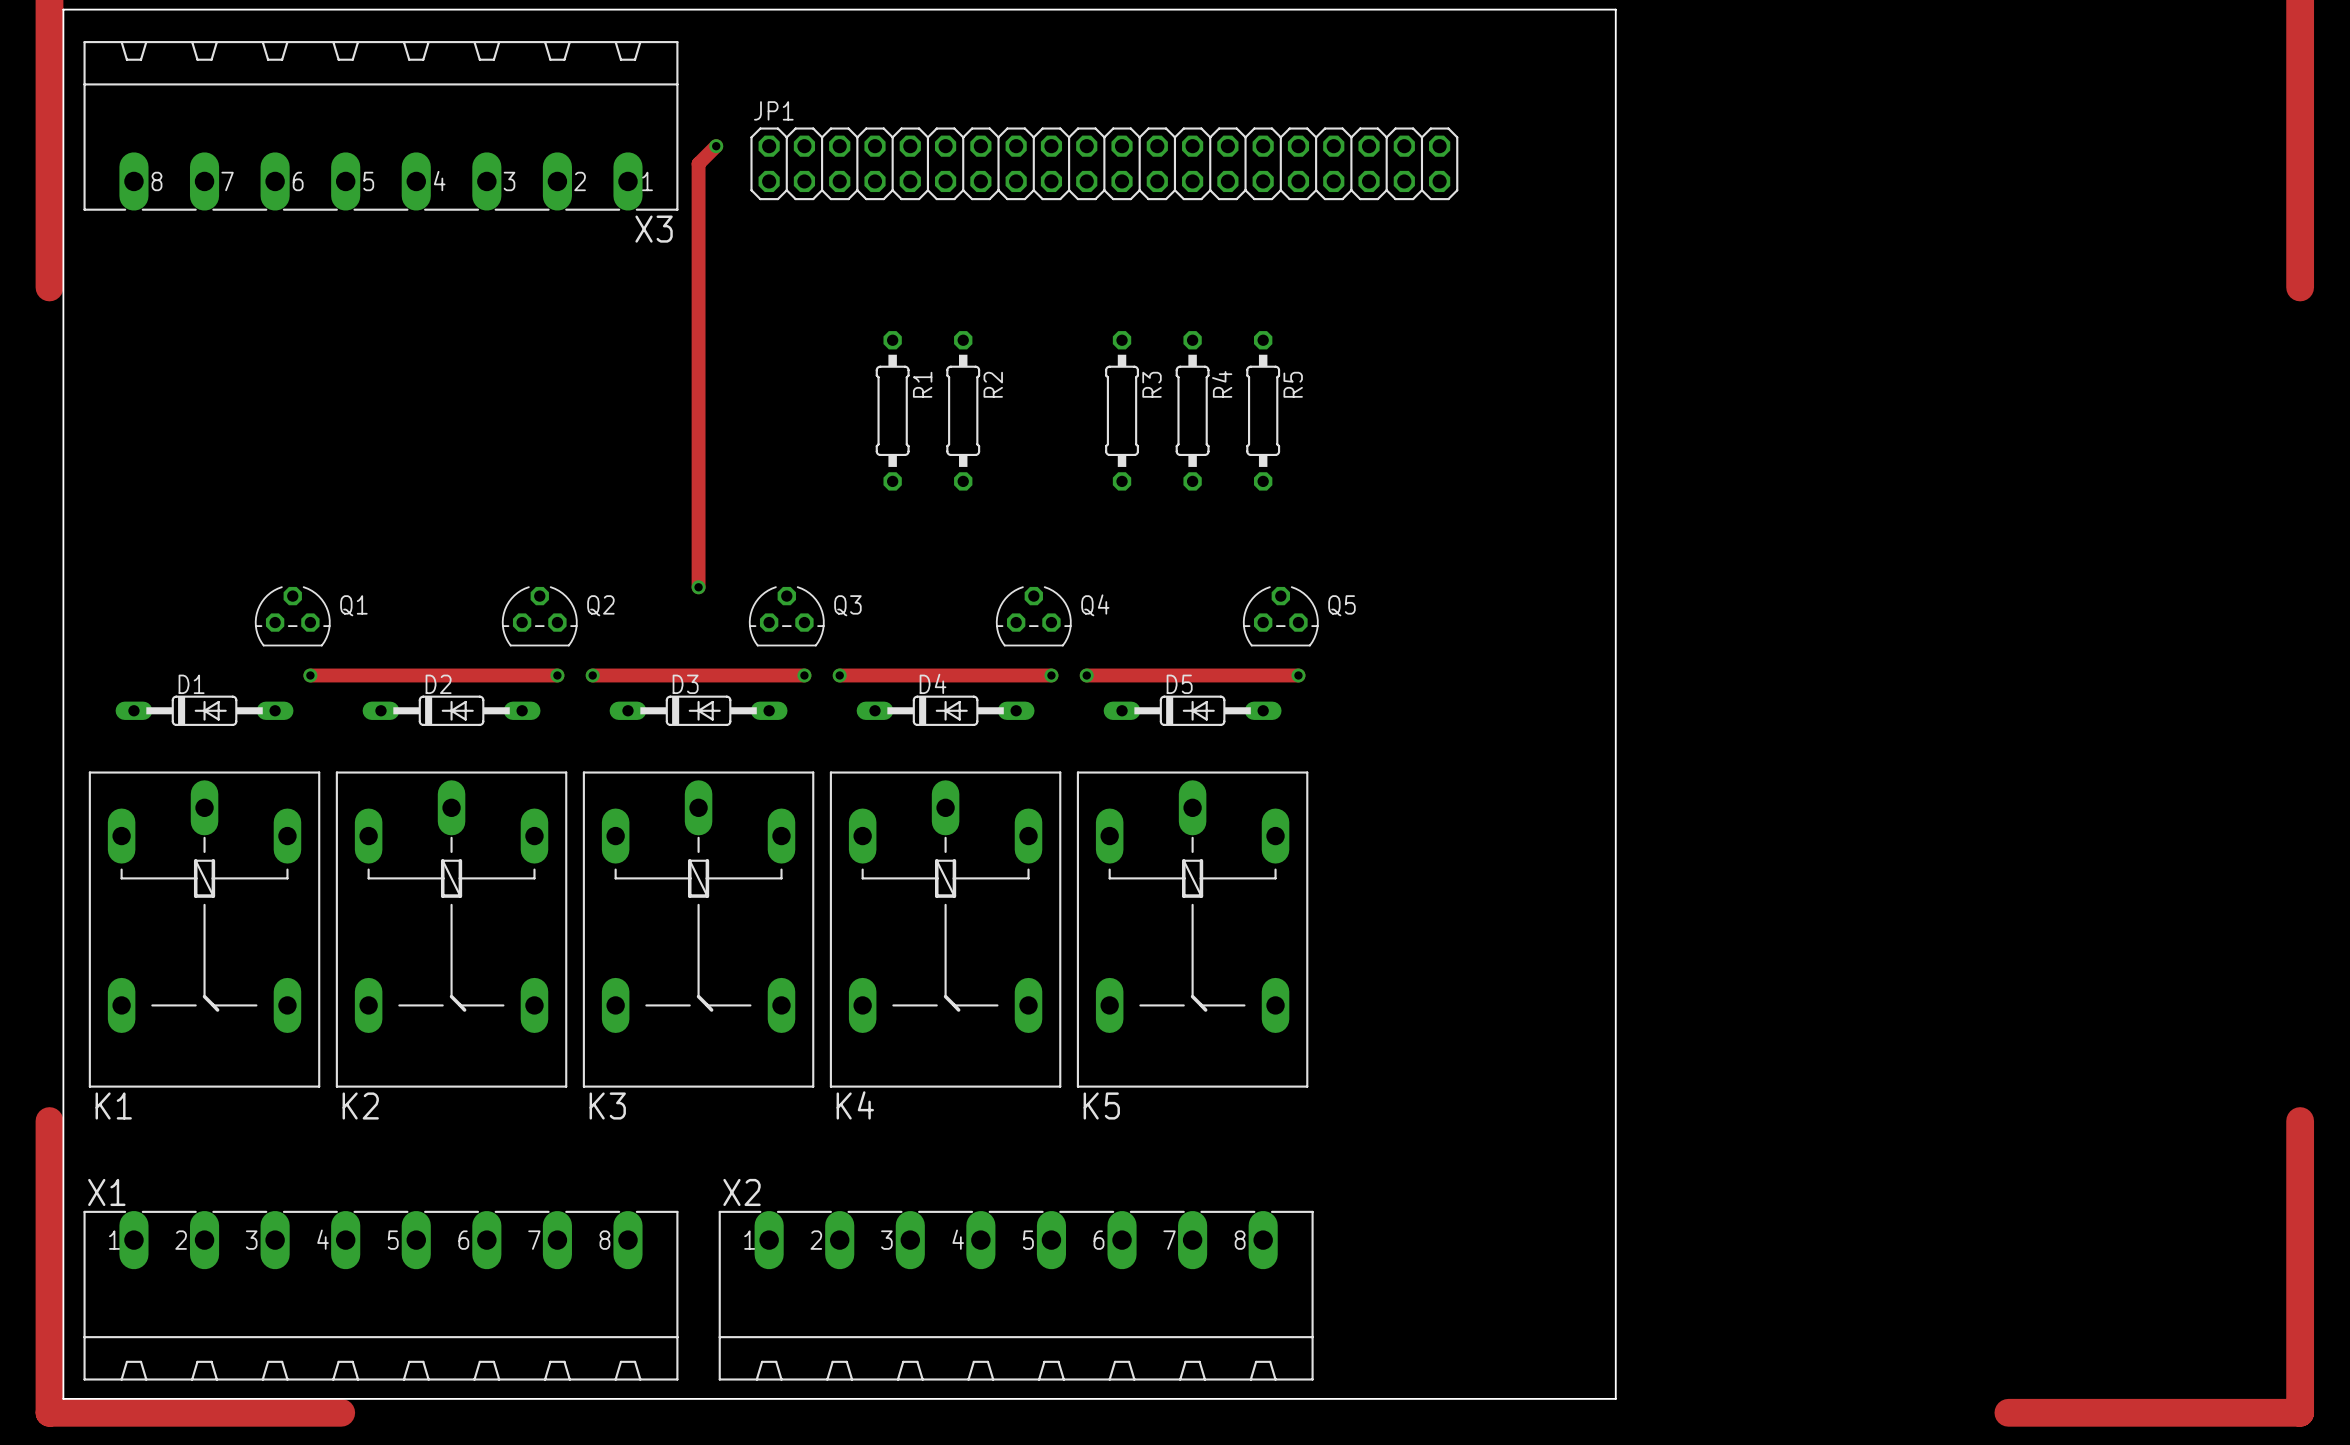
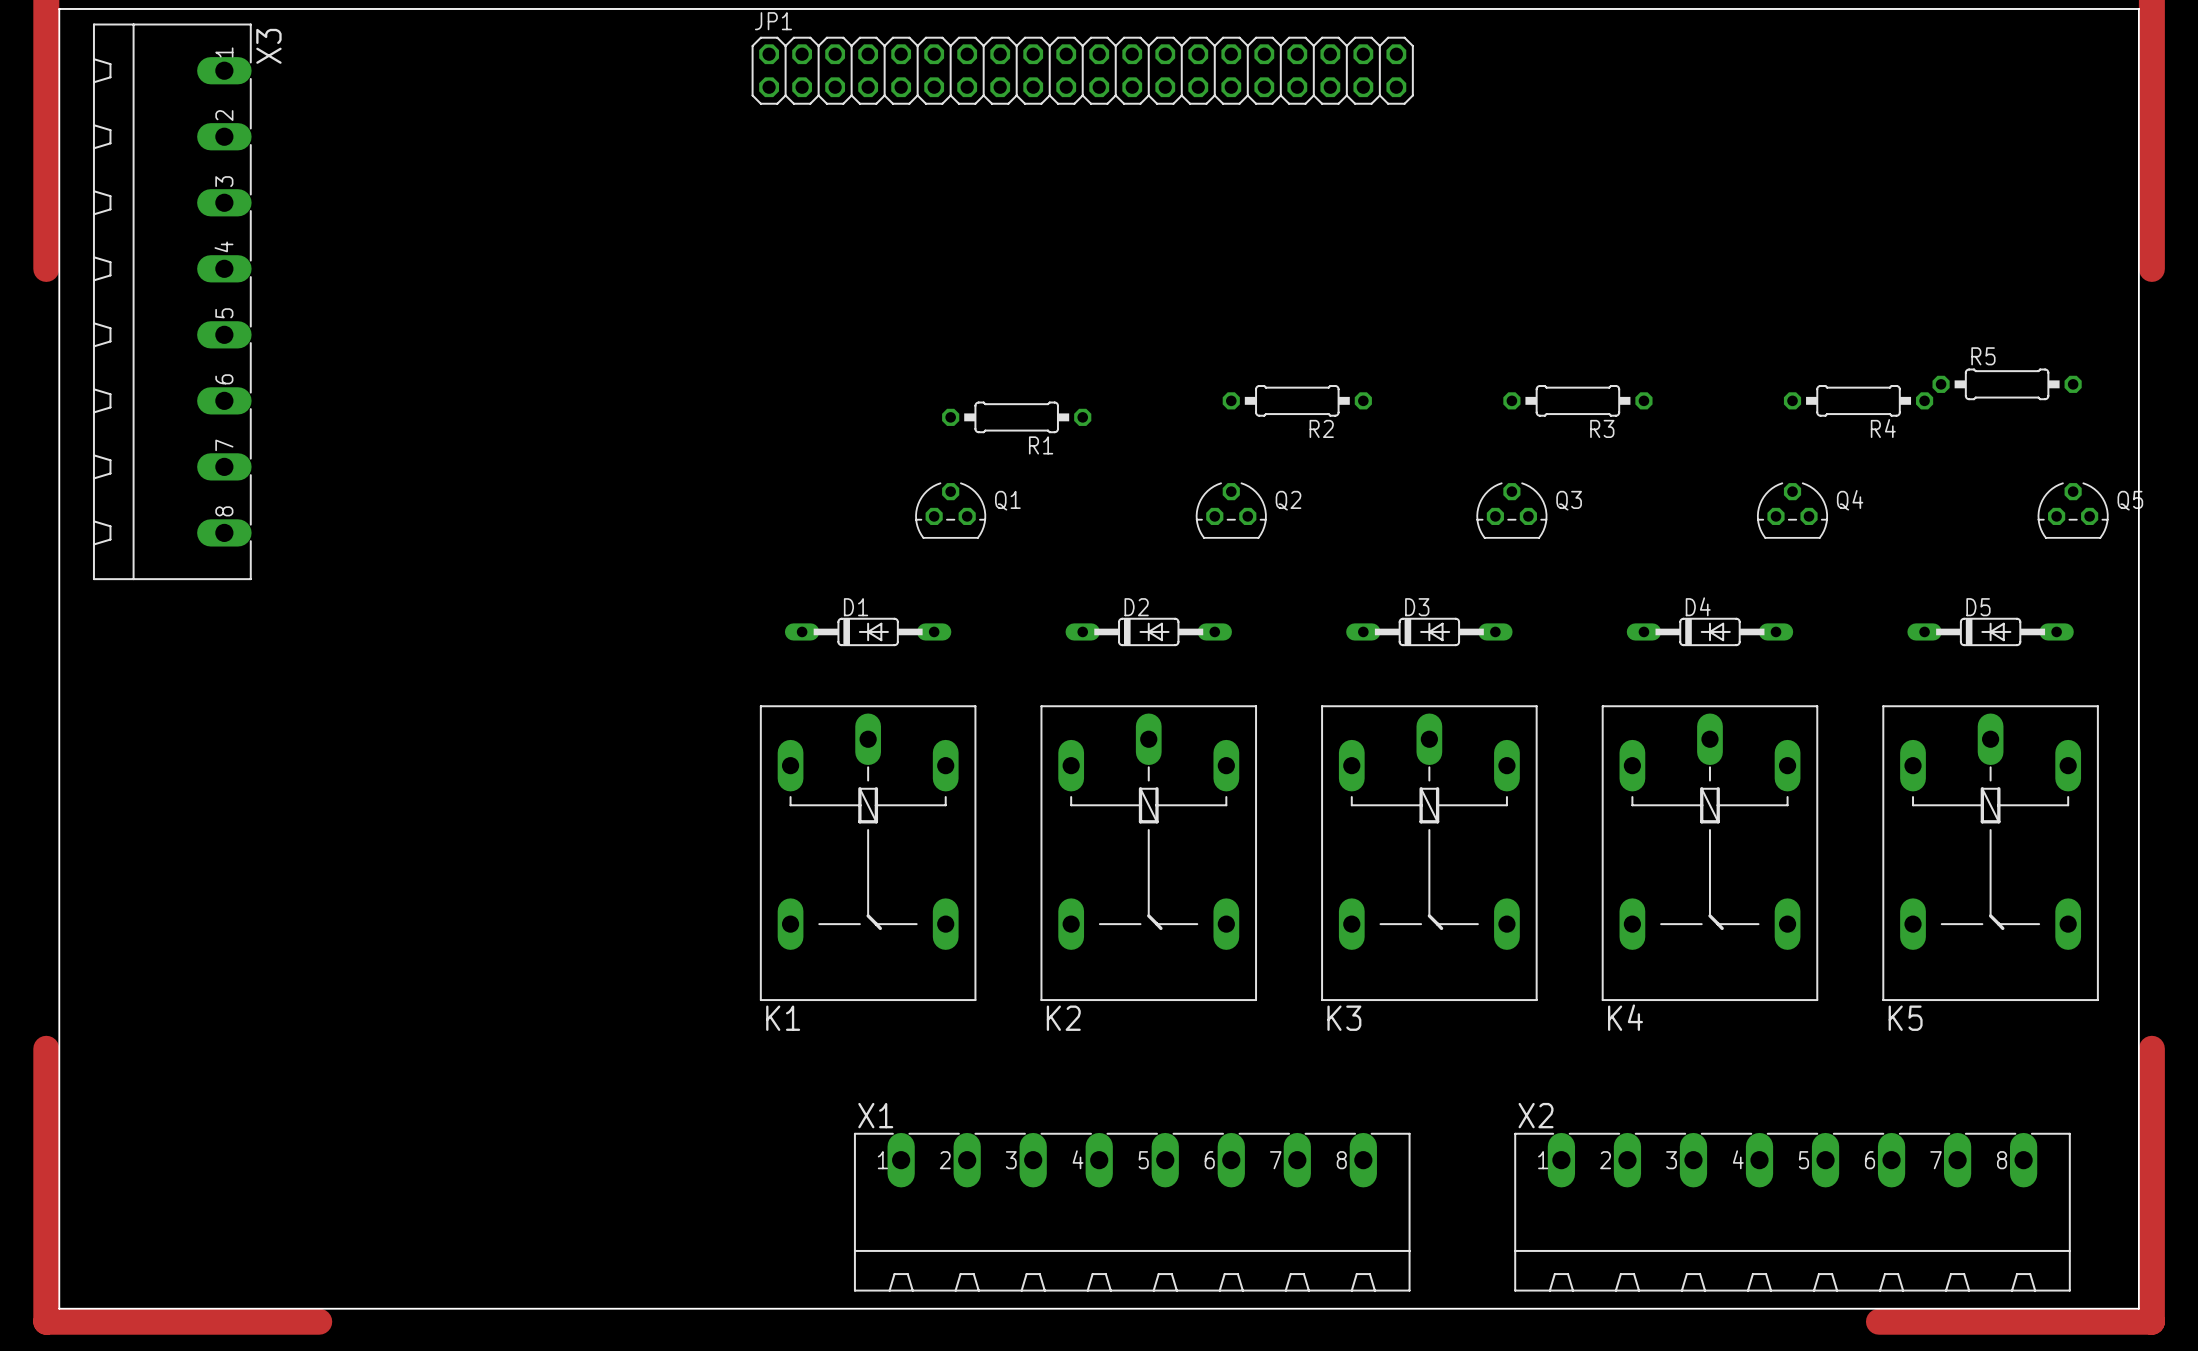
board edge: (1615, 9) (1615, 1398) -> (1511, 8) (2138, 8) (2138, 1308) (1511, 1308)
X3 rotation: 0° (380, 125) -> 90° counterclockwise (172, 301)
track: (716, 146) (698, 163) (698, 587) -> none
via: (716, 146) -> none
JP1 position: (1104, 163) -> (1082, 70)
R5 name position: R5 (1293, 384) -> R5 (1983, 356)
R1 rotation: 0° (892, 410) -> 90° clockwise (1016, 417)
R1 position: (892, 410) -> (1016, 417)
R2 rotation: 0° (963, 410) -> 90° clockwise (1297, 400)
R2 position: (963, 410) -> (1297, 400)
R3 rotation: 0° (1122, 410) -> 90° clockwise (1577, 400)
R3 position: (1122, 410) -> (1577, 400)
R4 rotation: 0° (1192, 410) -> 90° clockwise (1858, 400)
R4 position: (1192, 410) -> (1858, 400)
R5 rotation: 0° (1263, 410) -> 90° clockwise (2007, 384)
R5 position: (1263, 410) -> (2007, 384)
via: (698, 587) -> none
Q1 position: (292, 616) -> (950, 510)
Q2 position: (539, 616) -> (1231, 510)
Q3 position: (786, 616) -> (1511, 510)
Q4 position: (1033, 616) -> (1792, 510)
Q5 position: (1280, 616) -> (2073, 510)
track: (310, 675) (557, 675) -> none
via: (310, 675) -> none
via: (557, 675) -> none
track: (592, 675) (804, 675) -> none
via: (592, 675) -> none
via: (804, 675) -> none
track: (839, 675) (1051, 675) -> none
via: (839, 675) -> none
via: (1051, 675) -> none
track: (1086, 675) (1298, 675) -> none
via: (1086, 675) -> none
via: (1298, 675) -> none
D1 position: (204, 710) -> (868, 631)
D2 position: (451, 710) -> (1148, 631)
D3 position: (698, 710) -> (1429, 631)
D4 position: (945, 710) -> (1709, 631)
D5 position: (1192, 710) -> (1990, 631)
K1 position: (204, 929) -> (868, 853)
K2 position: (451, 929) -> (1148, 853)
K3 position: (698, 929) -> (1429, 853)
K4 position: (945, 929) -> (1709, 853)
K5 position: (1192, 929) -> (1990, 853)
X1 position: (380, 1295) -> (1132, 1212)
X2 position: (1016, 1295) -> (1792, 1212)

